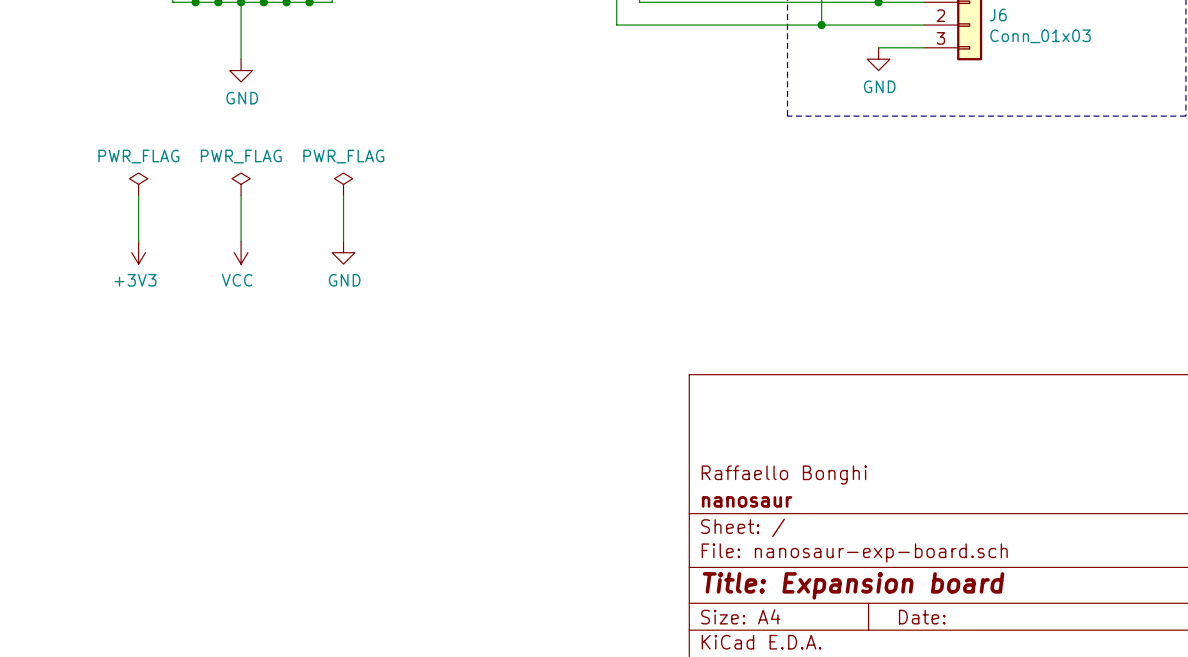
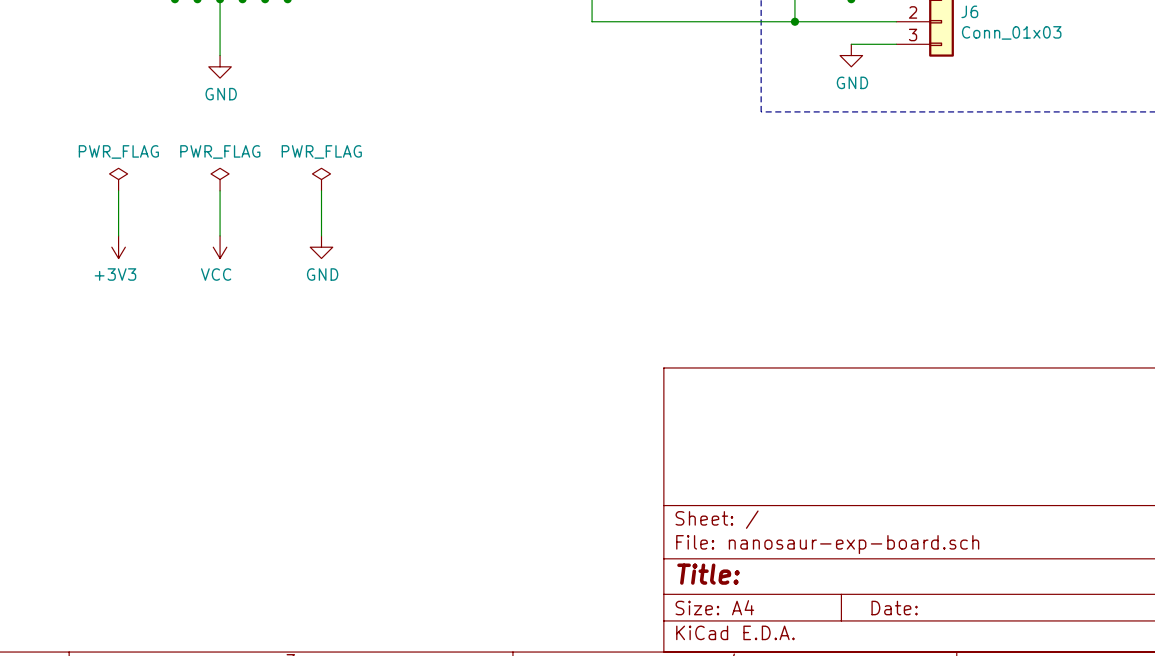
title block: Raffaello Bonghi (784, 475) -> none
title block: nanosaur (747, 501) -> none
title block: Title: Expansion board (853, 585) -> Title: (708, 574)

